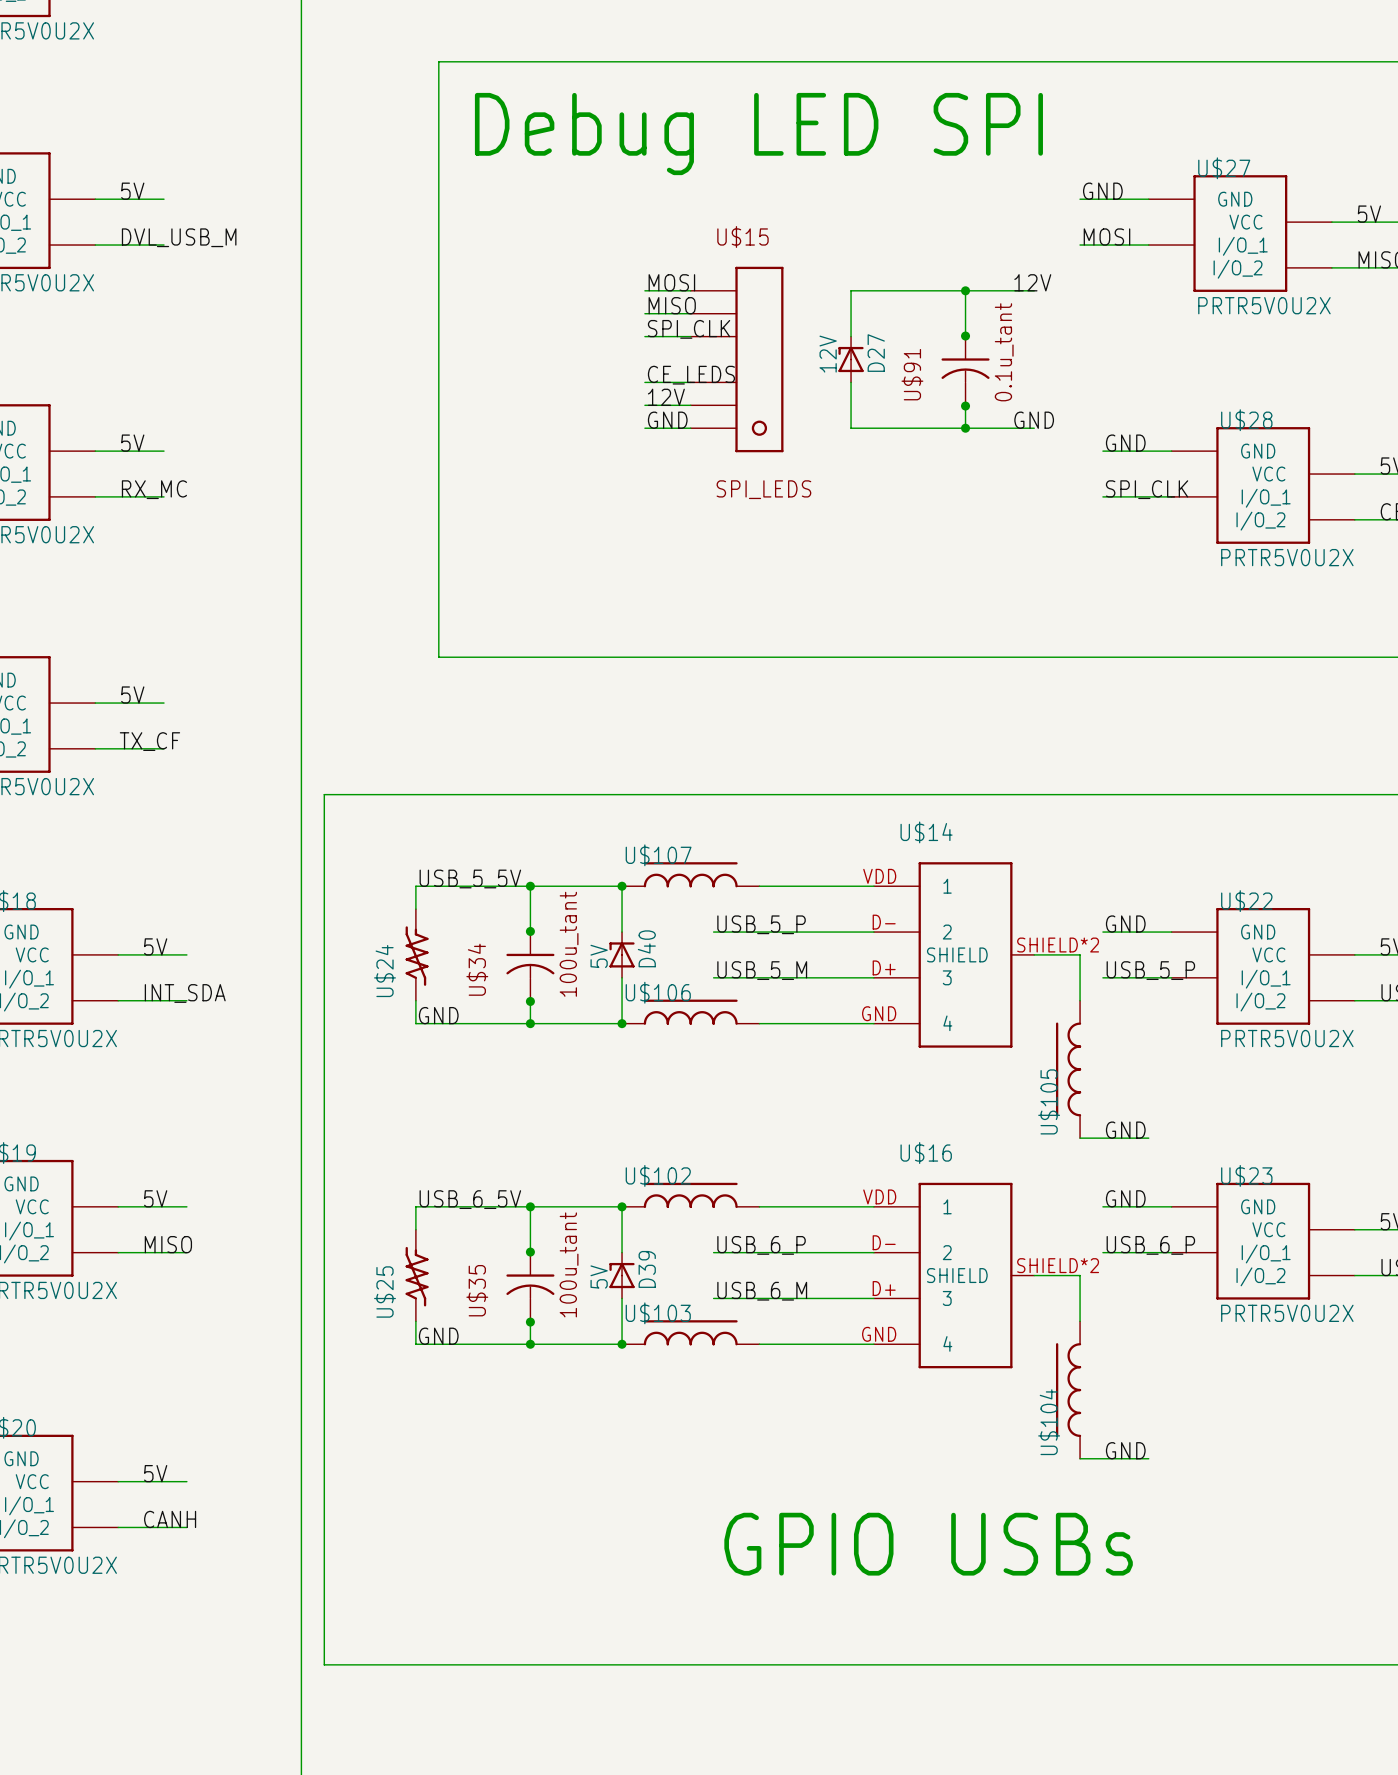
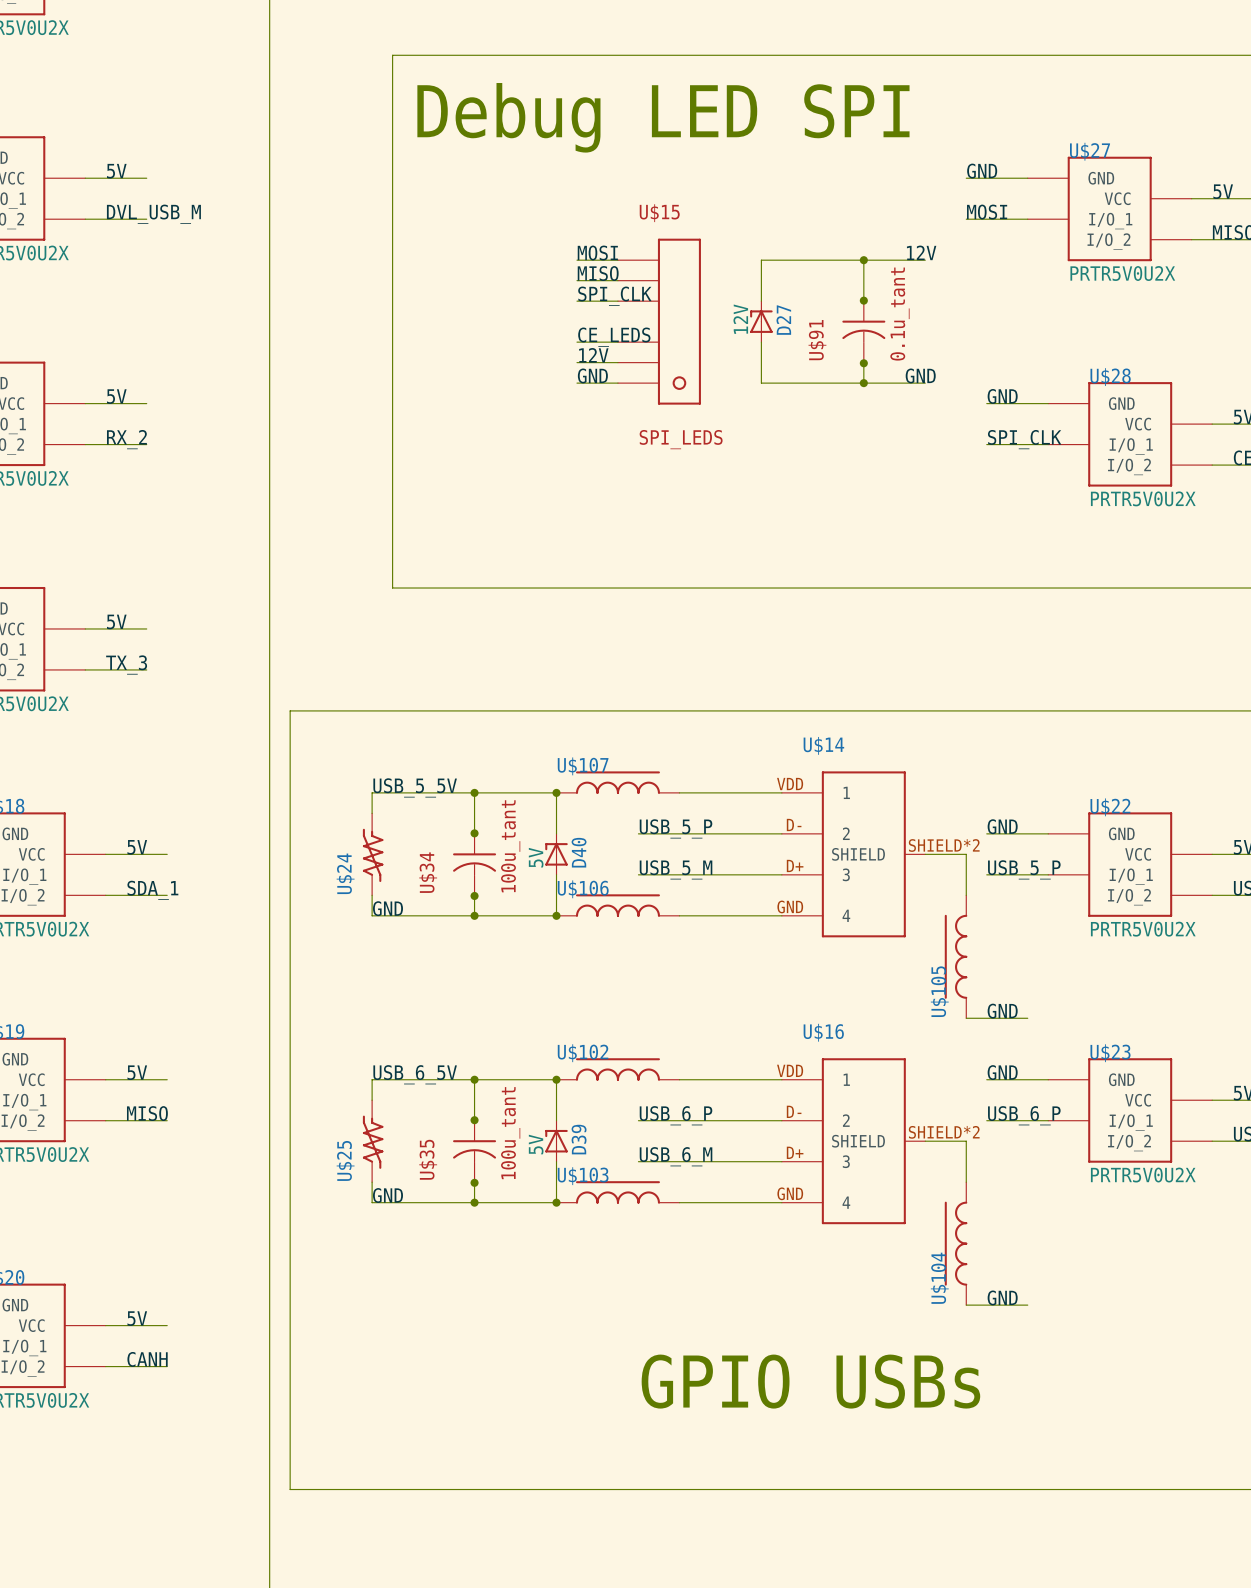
label: RX_MC (154, 489) -> RX_2 (126, 439)
label: TX_CF (149, 741) -> TX_3 (126, 664)
label: INT_SDA (185, 993) -> SDA_1 (152, 890)

